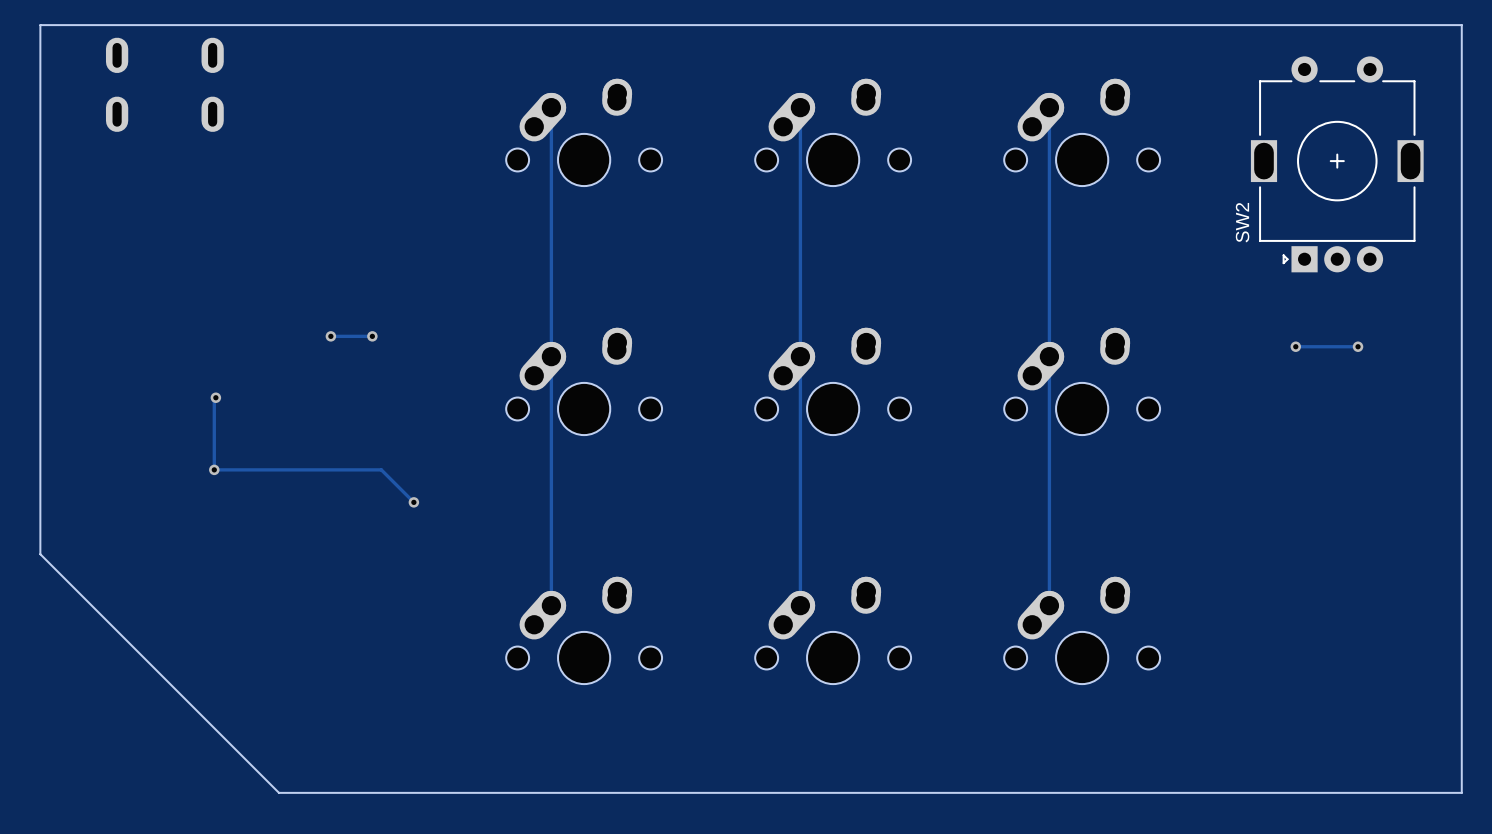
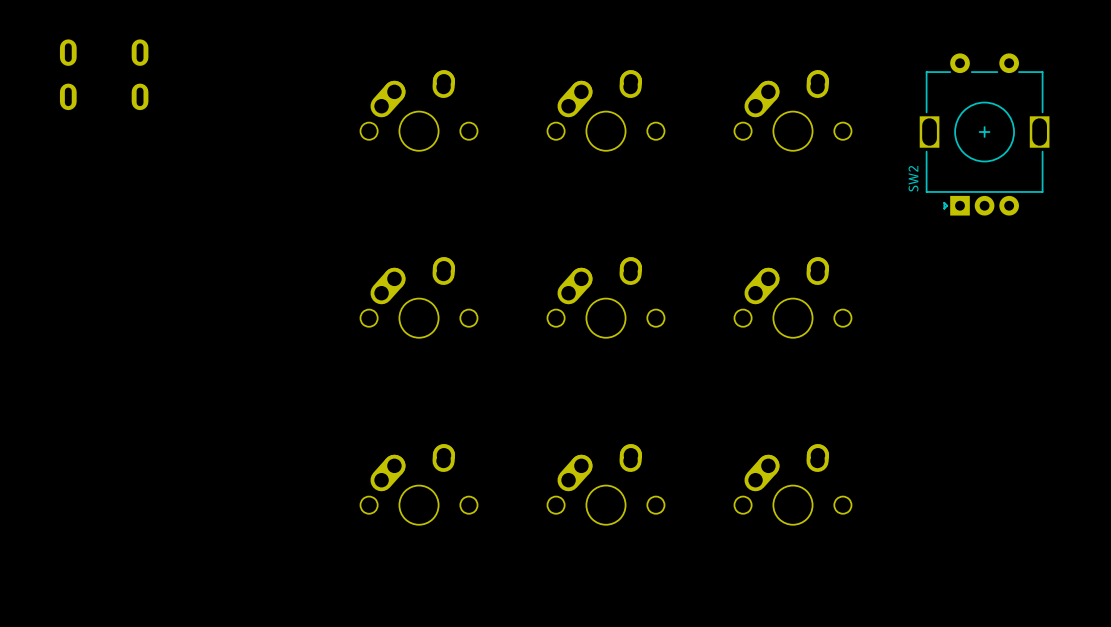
board edge: (40, 25) (1461, 25) (1461, 792) (279, 792) (40, 554) (40, 25) -> none
track: (551, 107) (551, 605) -> none
track: (800, 107) (800, 605) -> none
track: (1049, 107) (1049, 605) -> none
track: (330, 336) (372, 336) -> none
via: (330, 336) -> none
via: (372, 336) -> none
track: (1295, 346) (1358, 346) -> none
via: (1295, 346) -> none
via: (1358, 346) -> none
track: (215, 397) (214, 399) (214, 469) (381, 469) (413, 502) -> none
via: (215, 397) -> none
via: (214, 469) -> none
via: (413, 502) -> none

